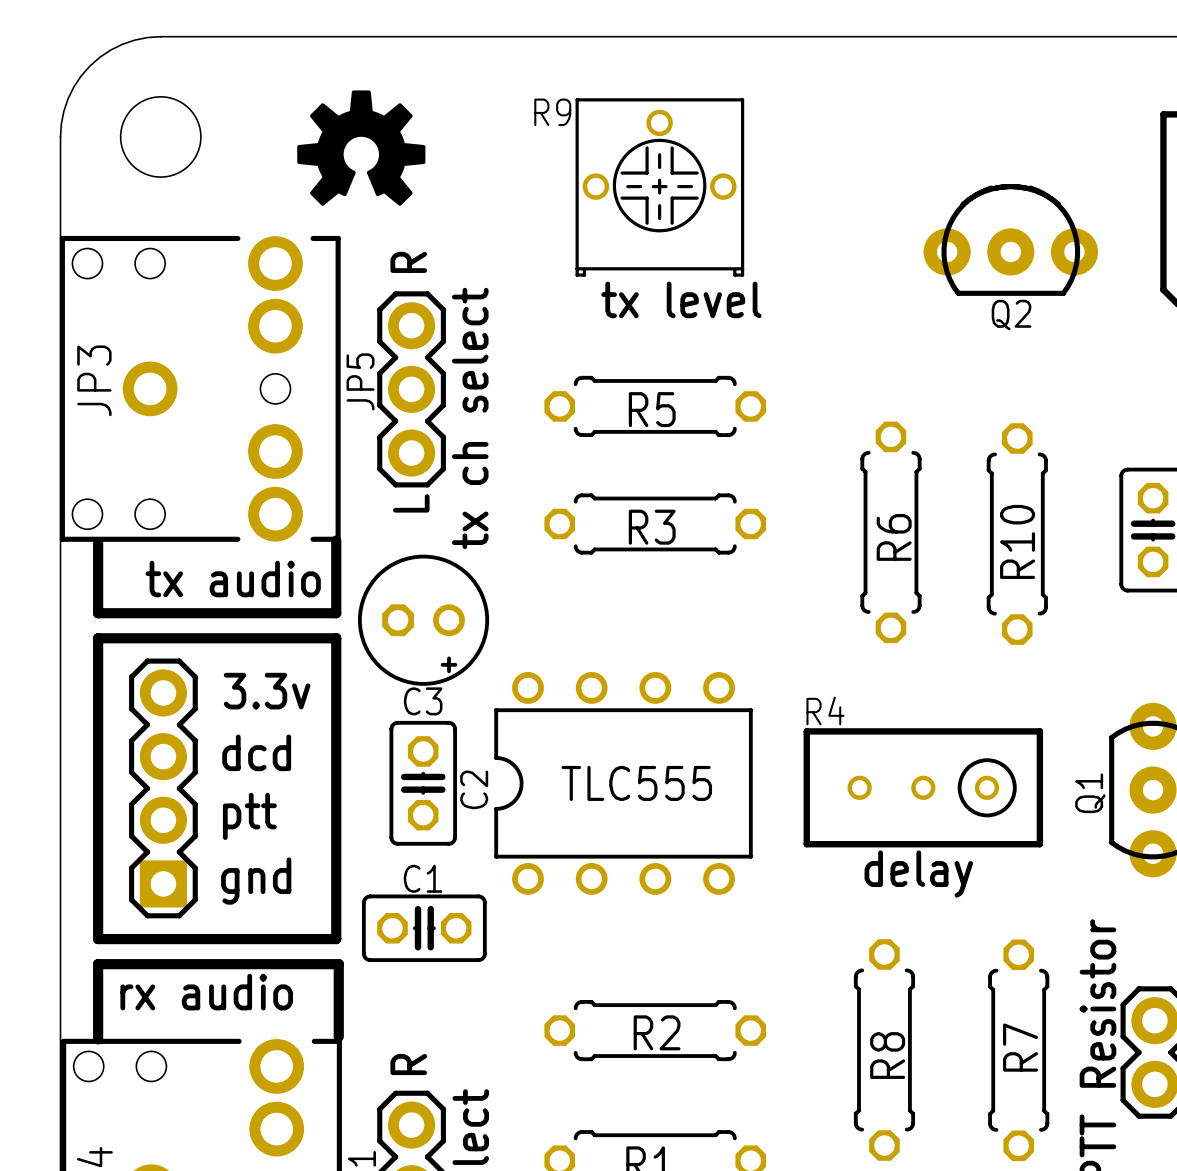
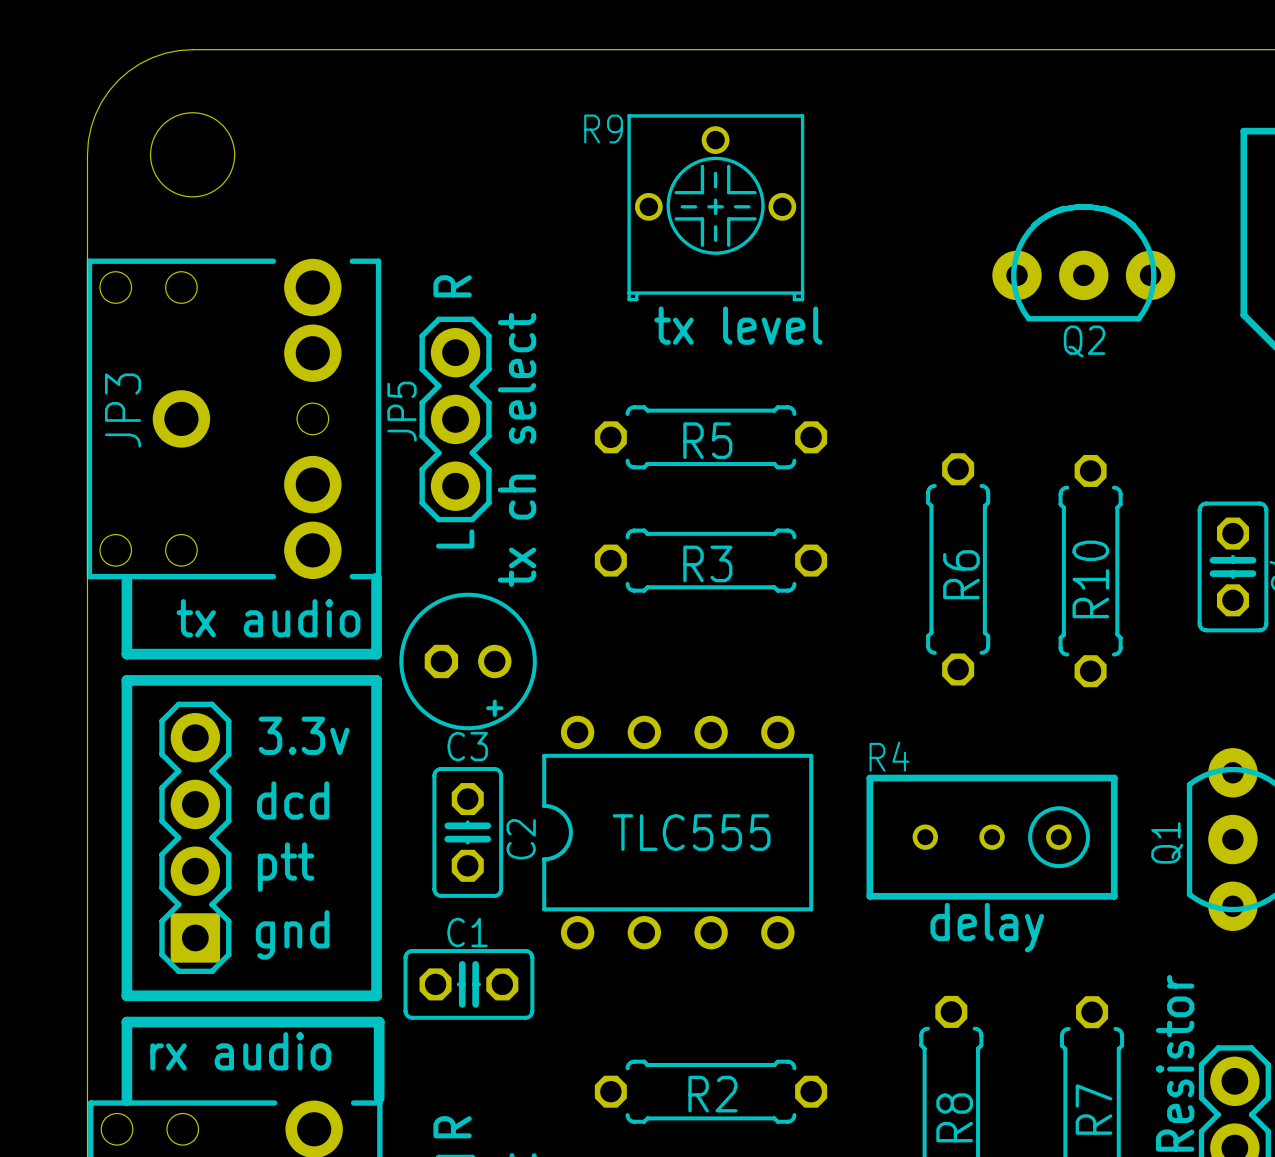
drawing: [297, 90, 426, 206] -> none

